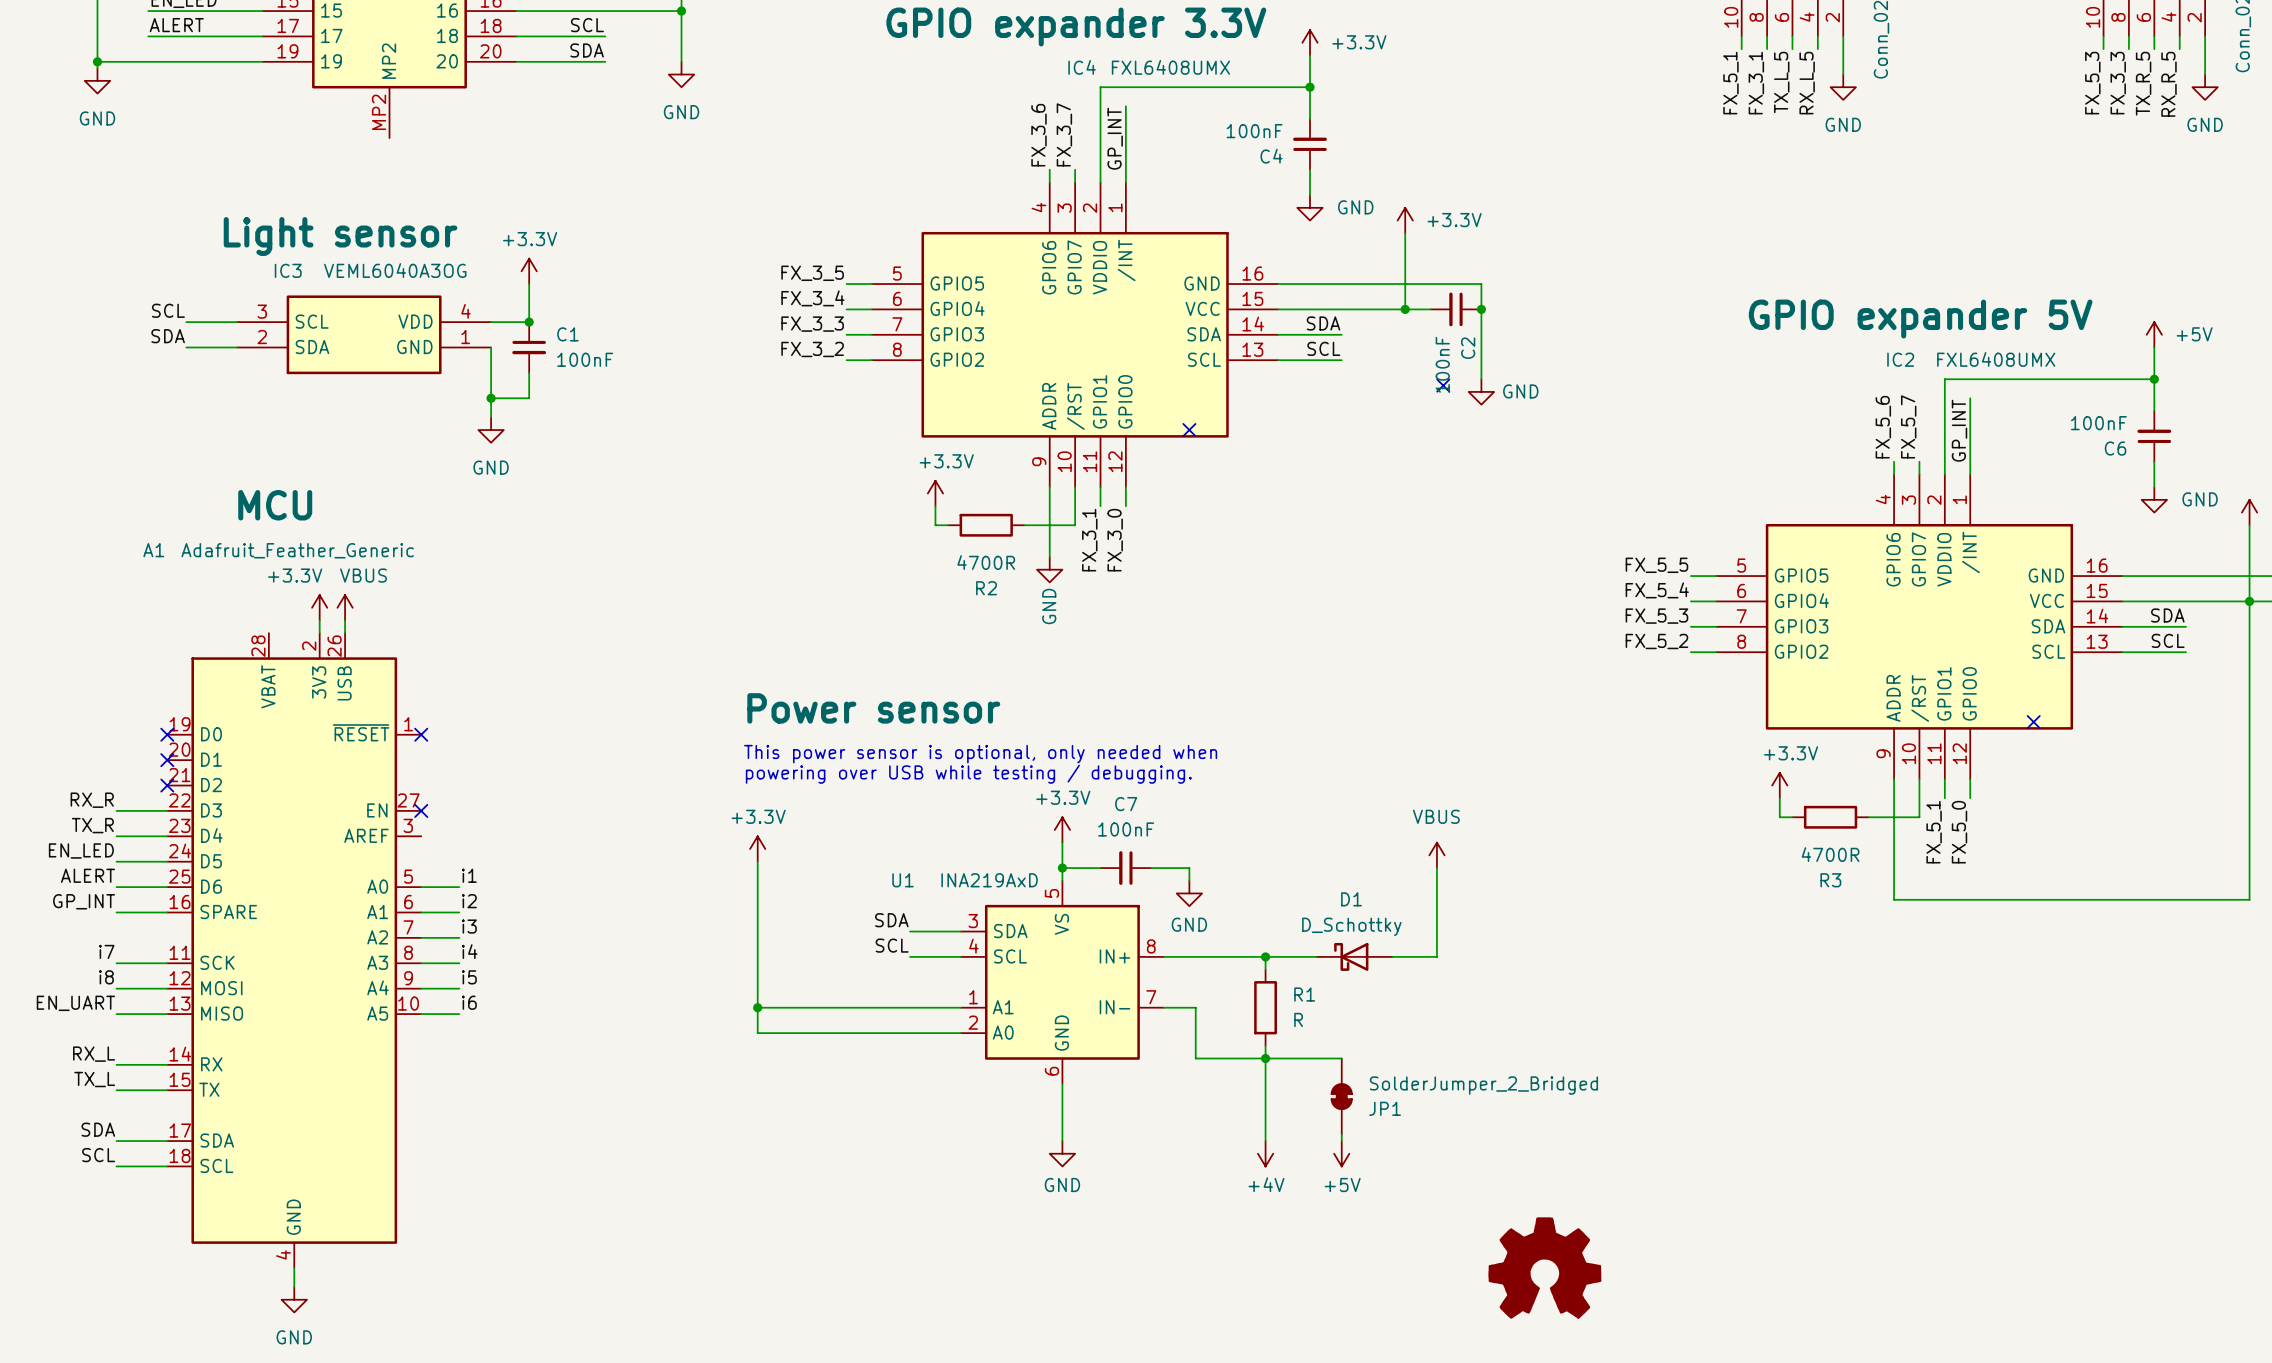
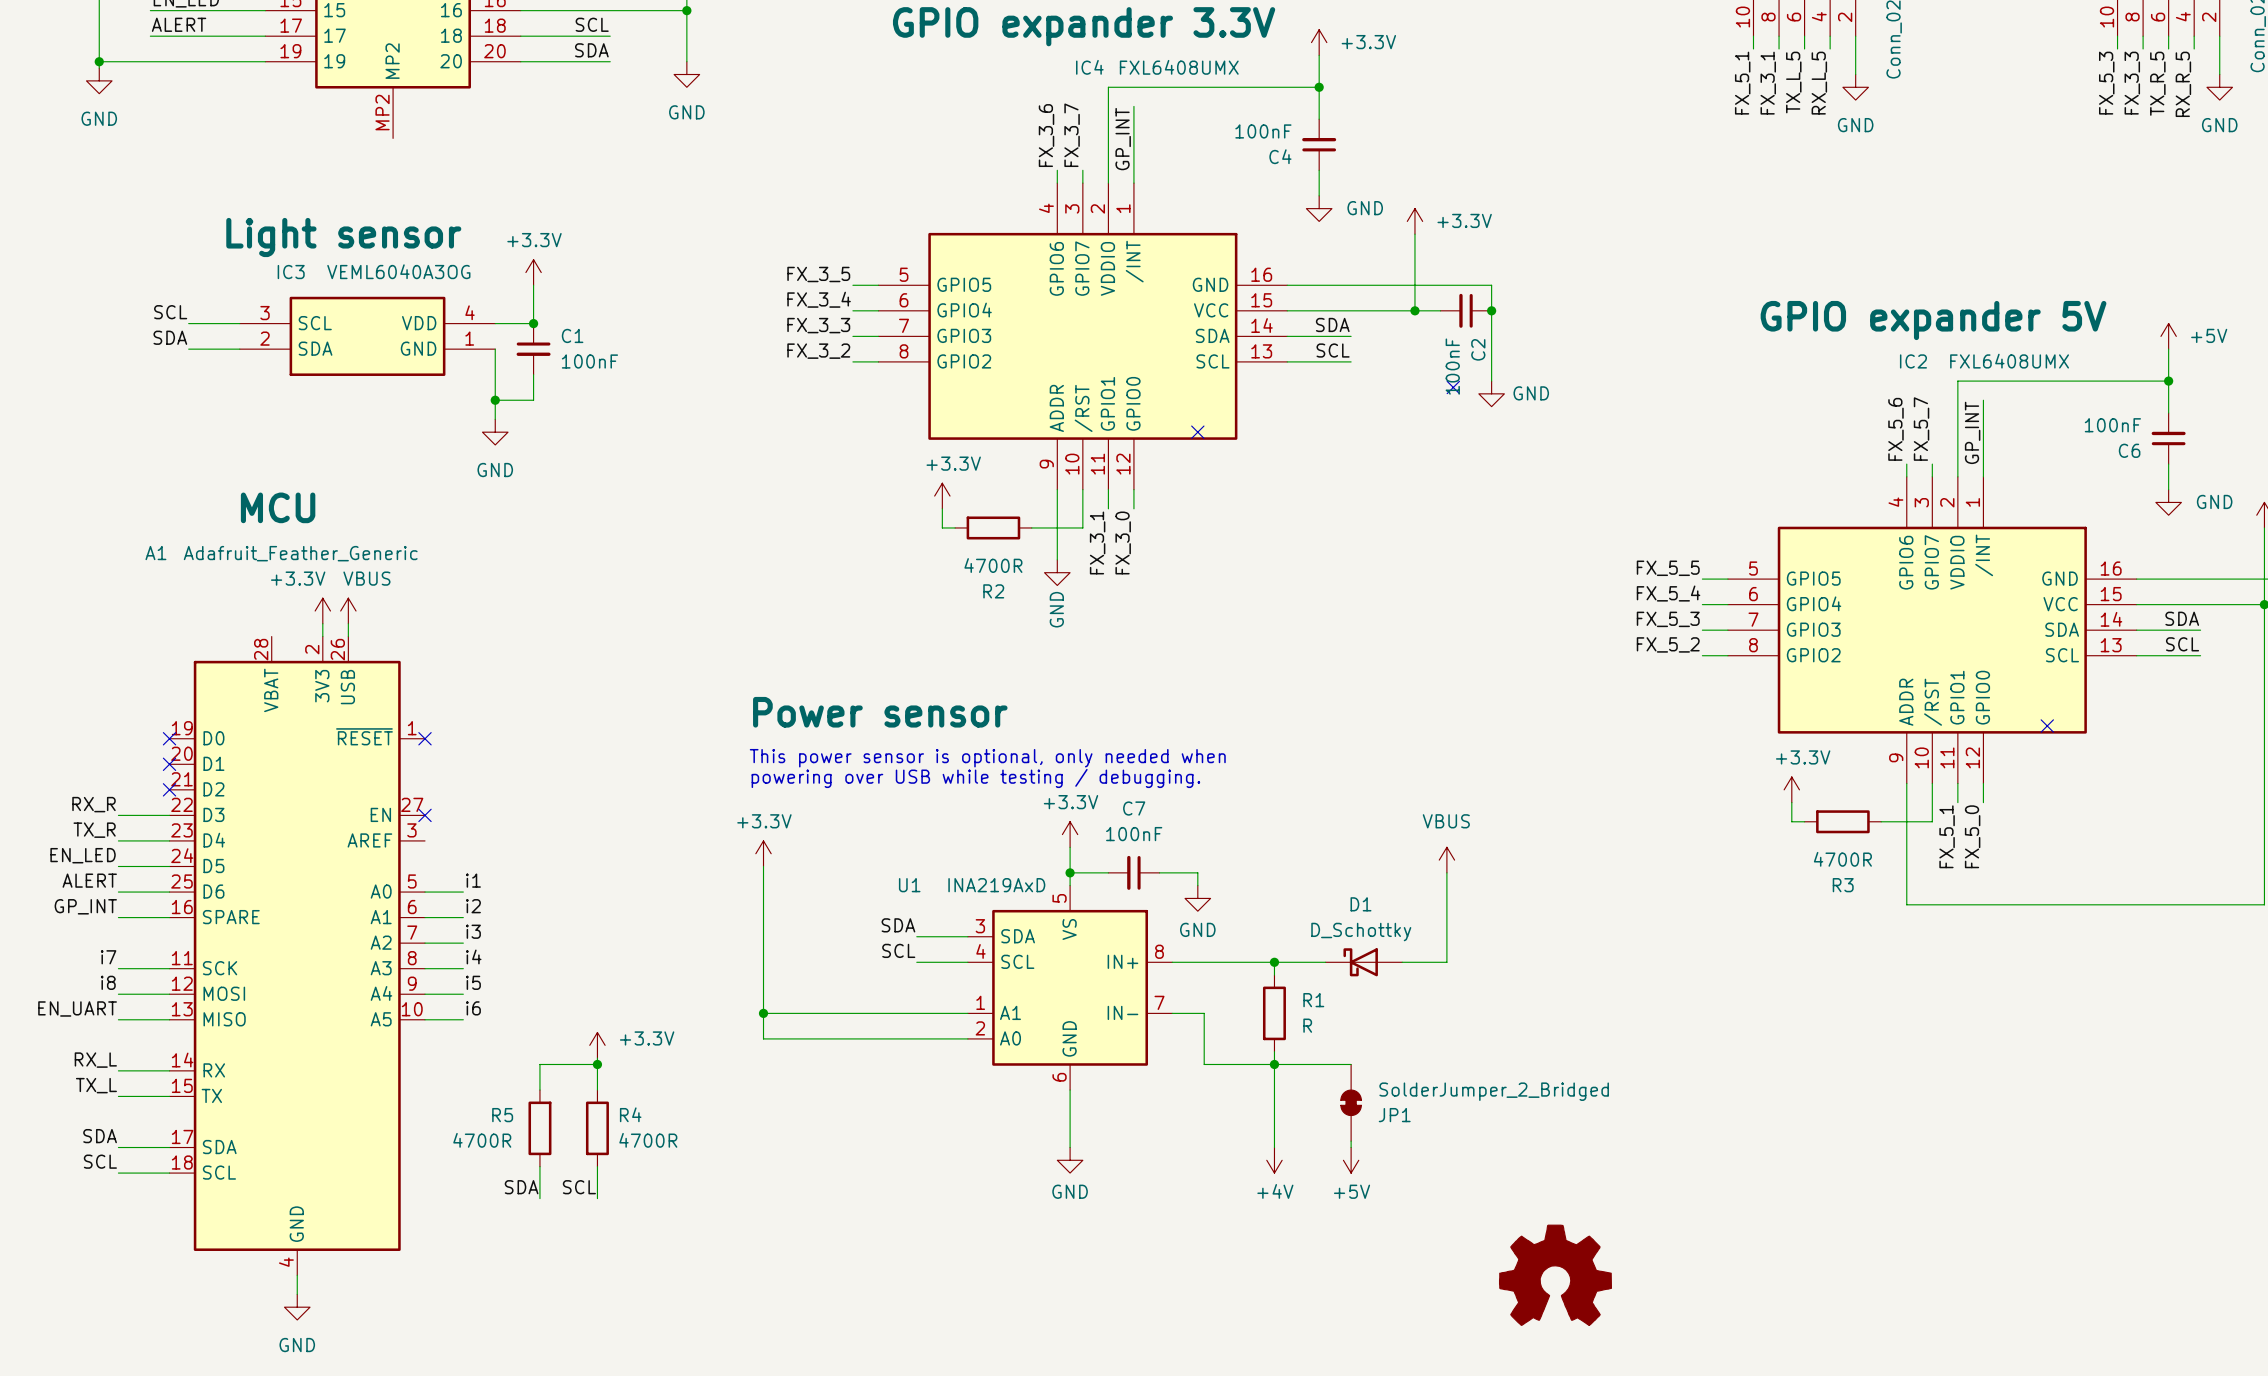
power symbol: none -> +3.3V (597, 1045)
wire: none -> (597, 1058) (597, 1090)
wire: none -> (597, 1064) (539, 1064) (539, 1090)
junction: none -> (597, 1064)
R5: none -> 4700R (539, 1128)
R4: none -> 4700R (597, 1128)
wire: none -> (539, 1166) (539, 1198)
wire: none -> (597, 1166) (597, 1198)
label: none -> SDA (521, 1187)
label: none -> SCL (579, 1187)

